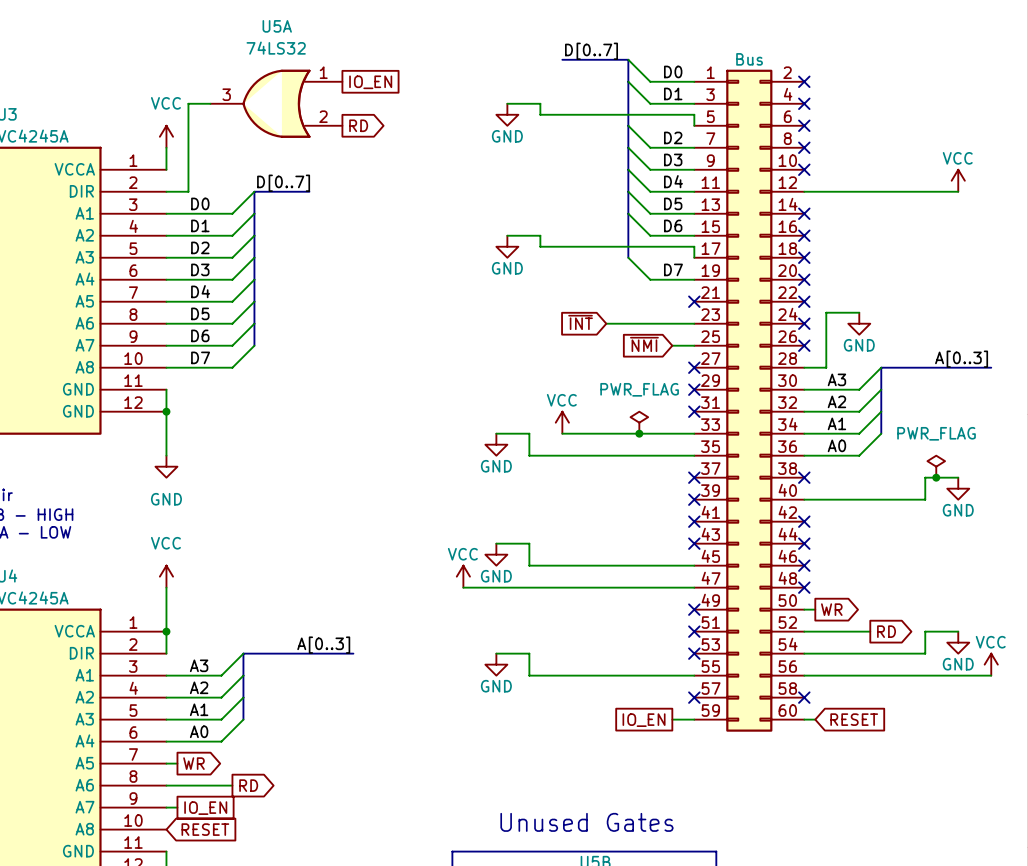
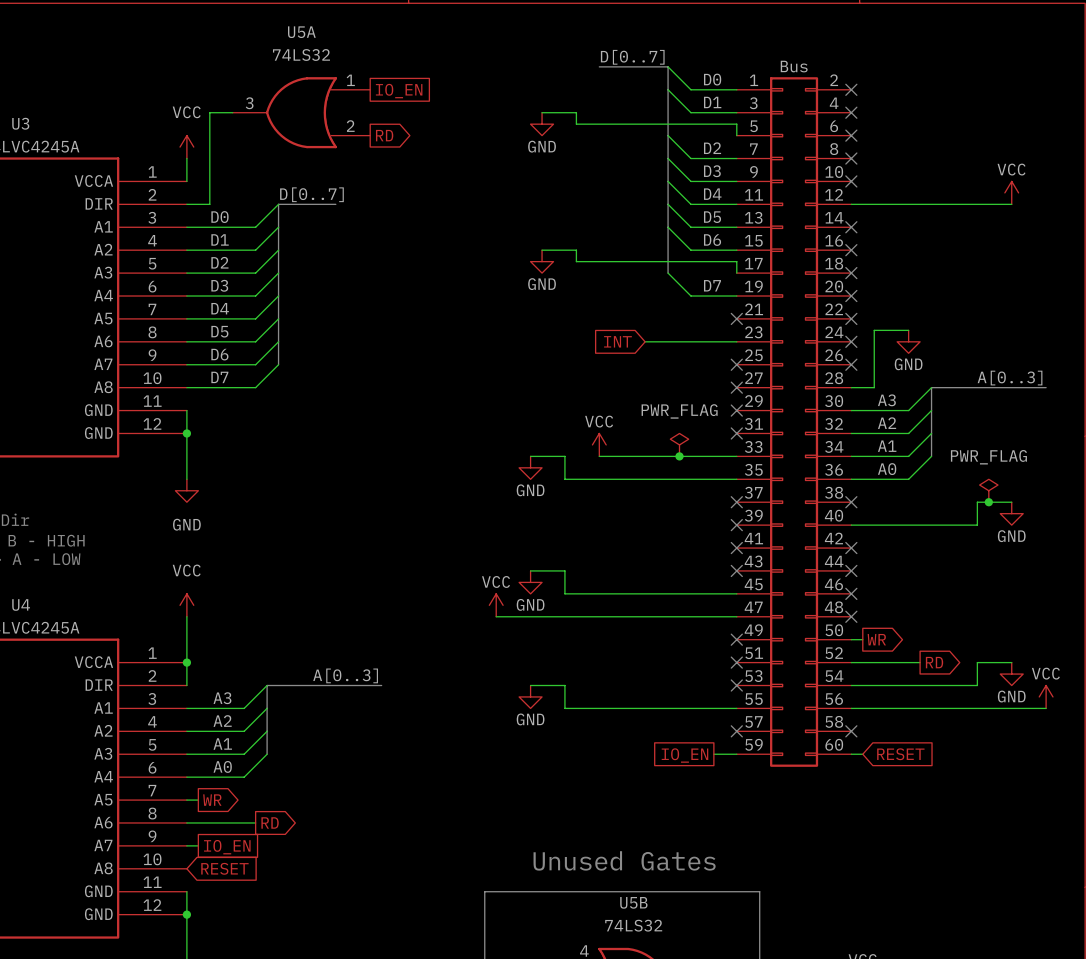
global label: ~{INT} (580, 322) -> INT (617, 341)
global label: ~{NMI} (644, 344) -> none
wire: (672, 345) (694, 345) -> none
no-connect mark: none -> (736, 364)

